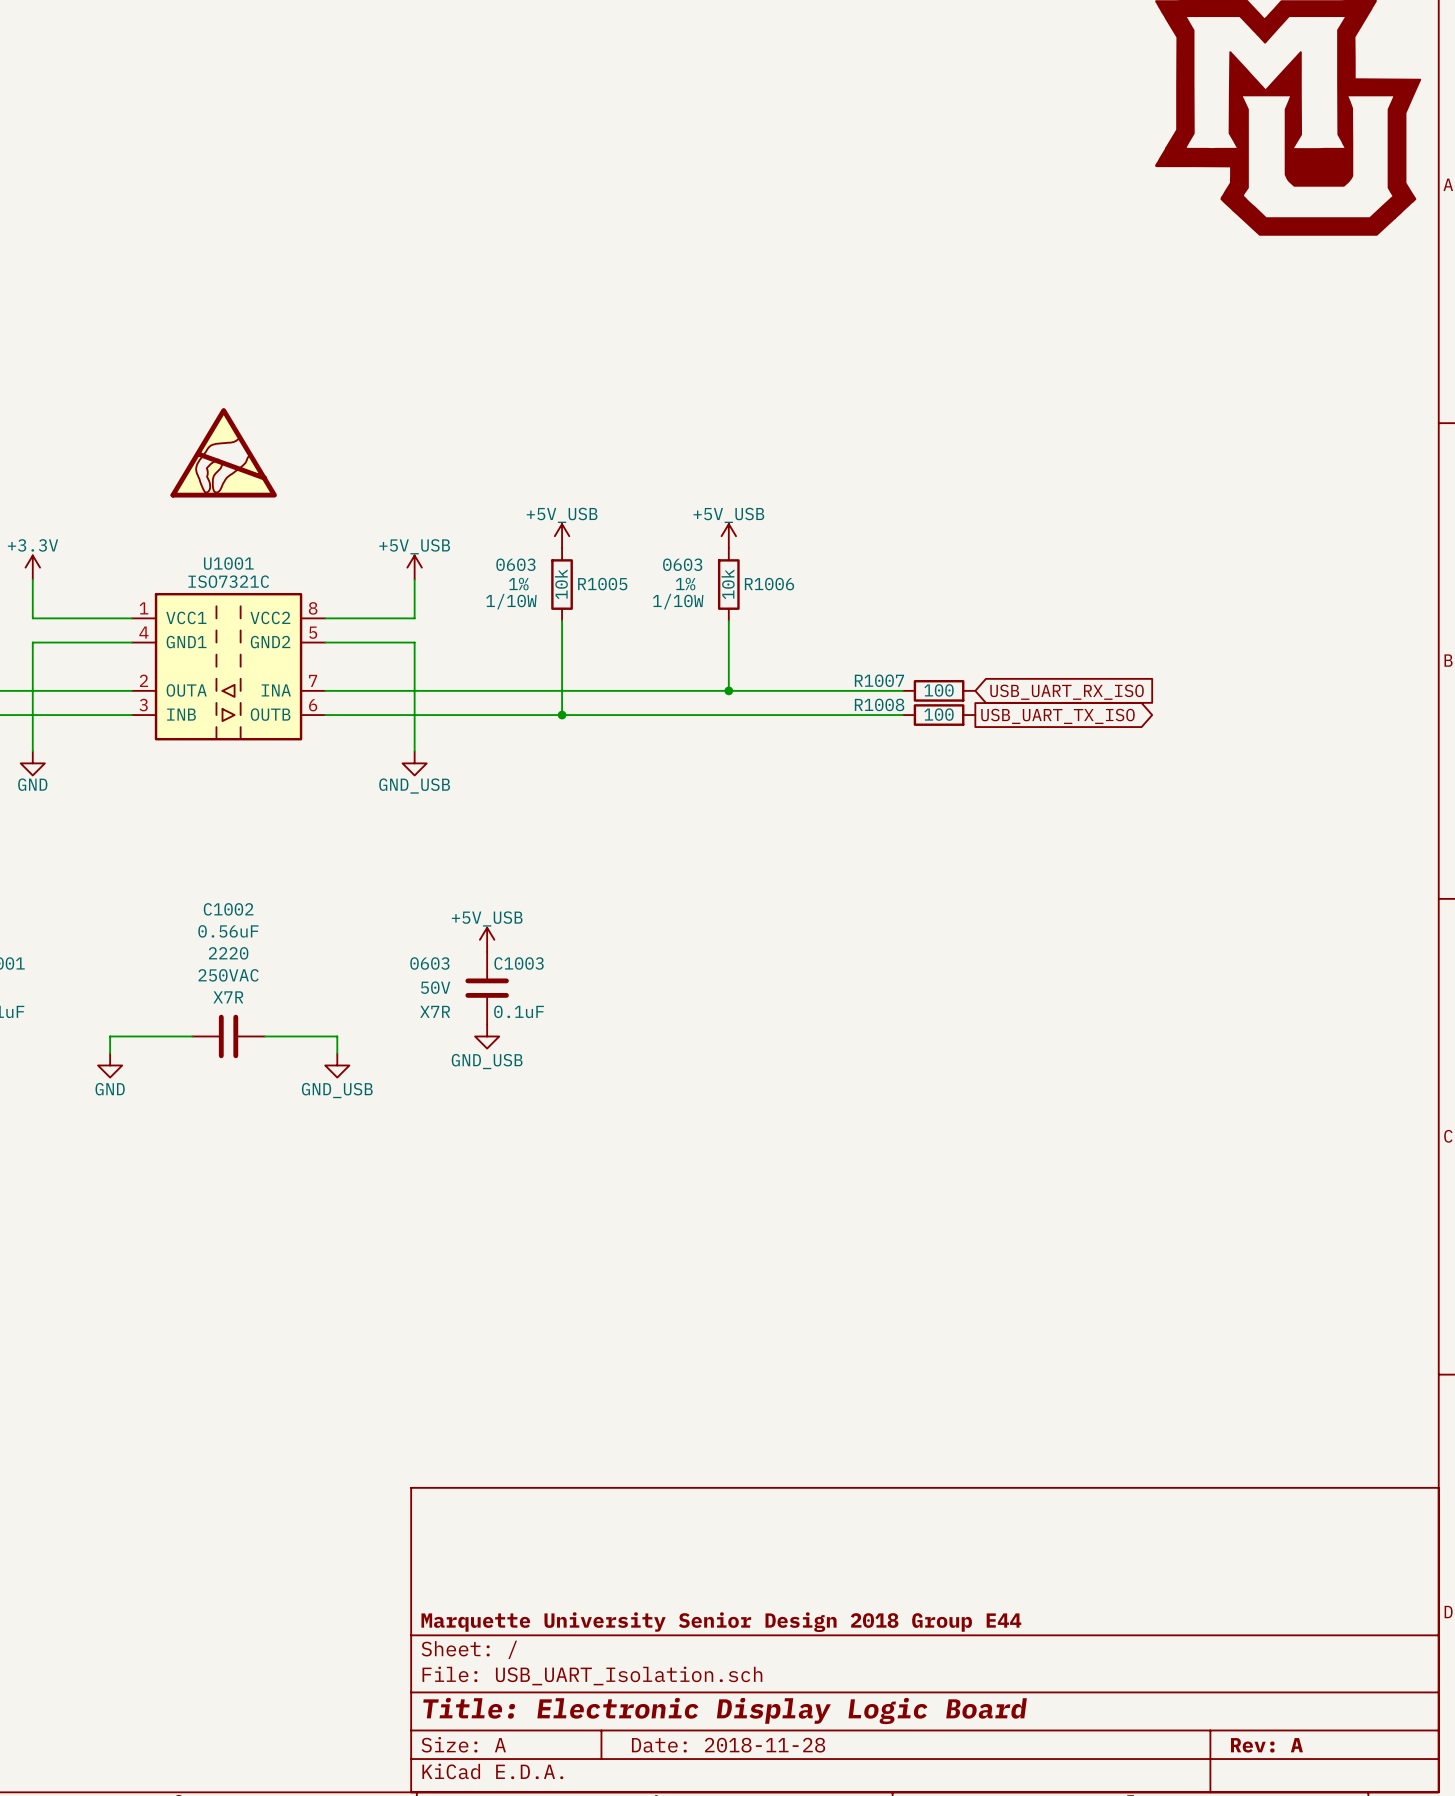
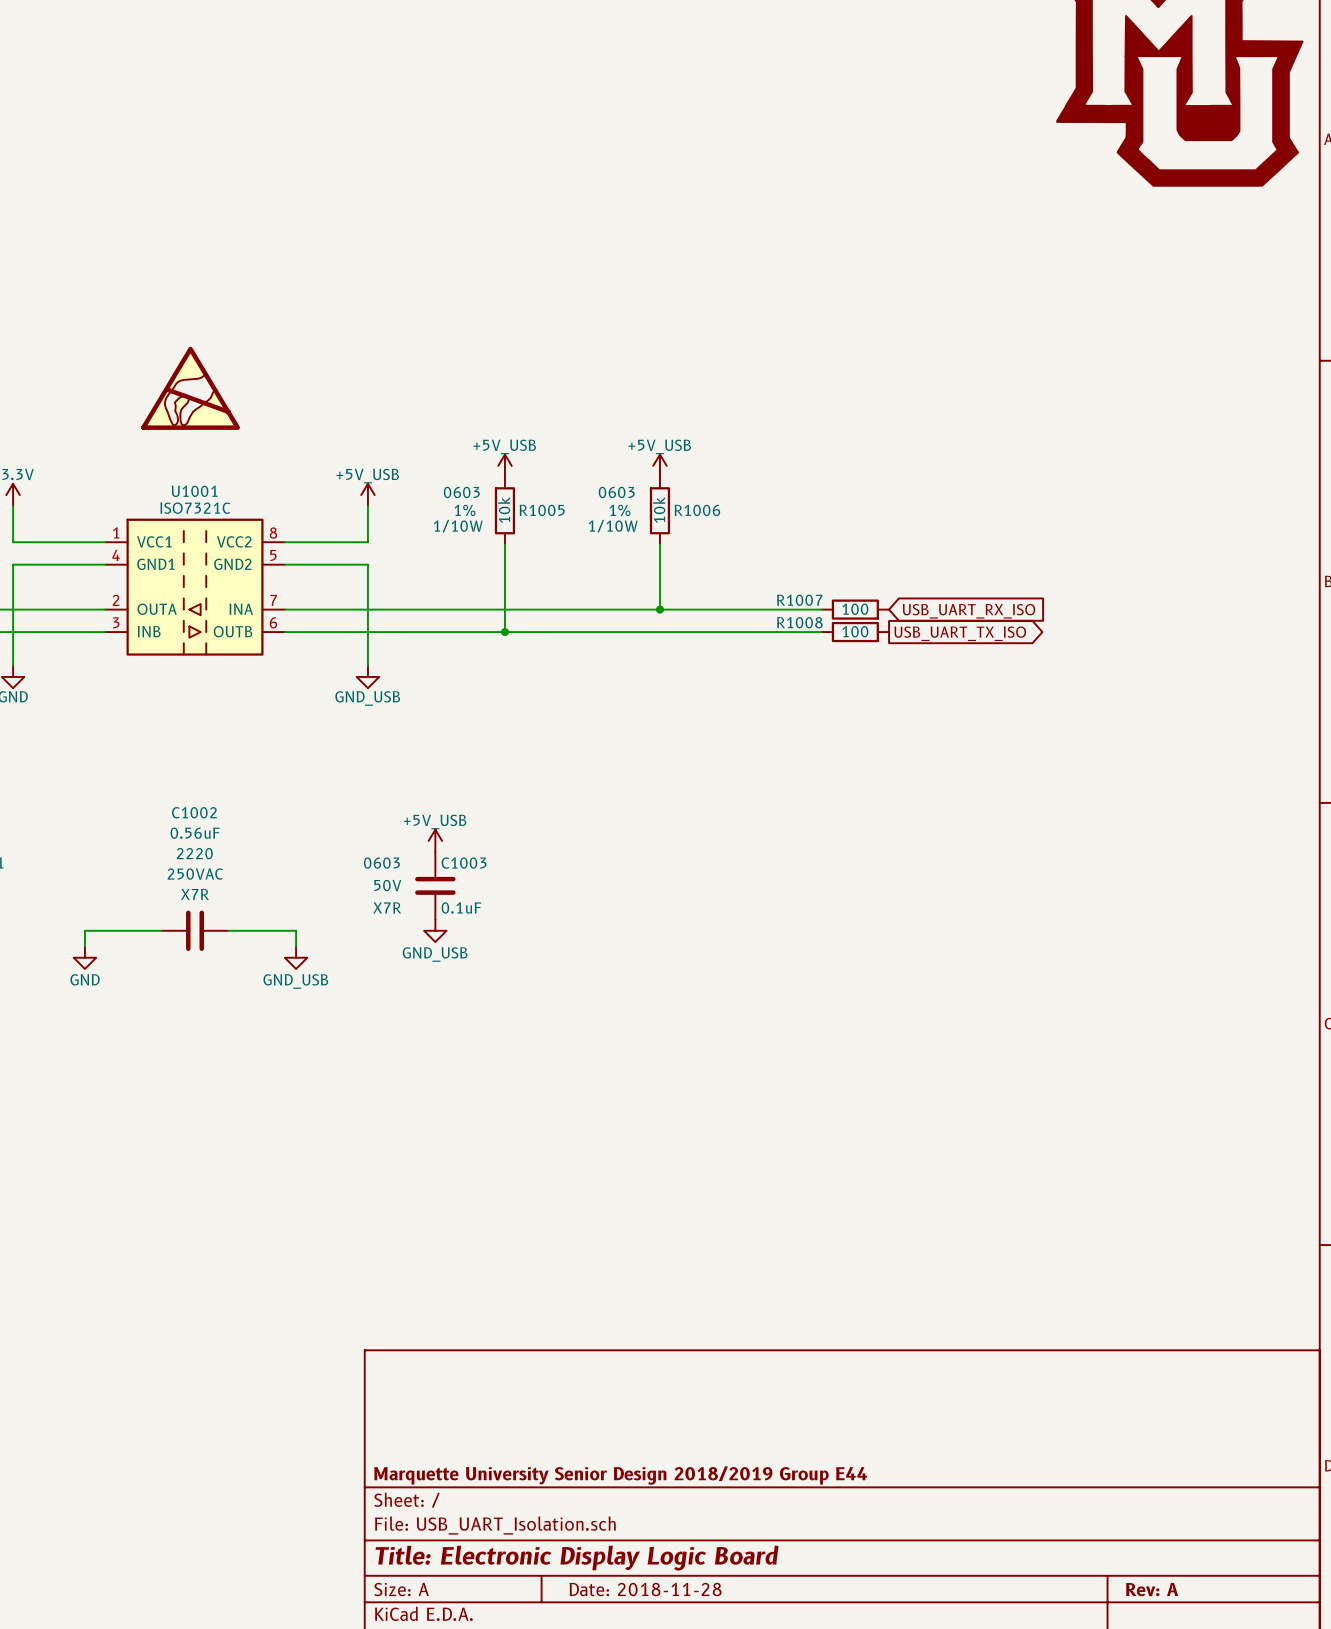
title block: Marquette University Senior Design 2018 Group E44 (721, 1622) -> Marquette University Senior Design 2018/2019 Group E44 (620, 1475)

